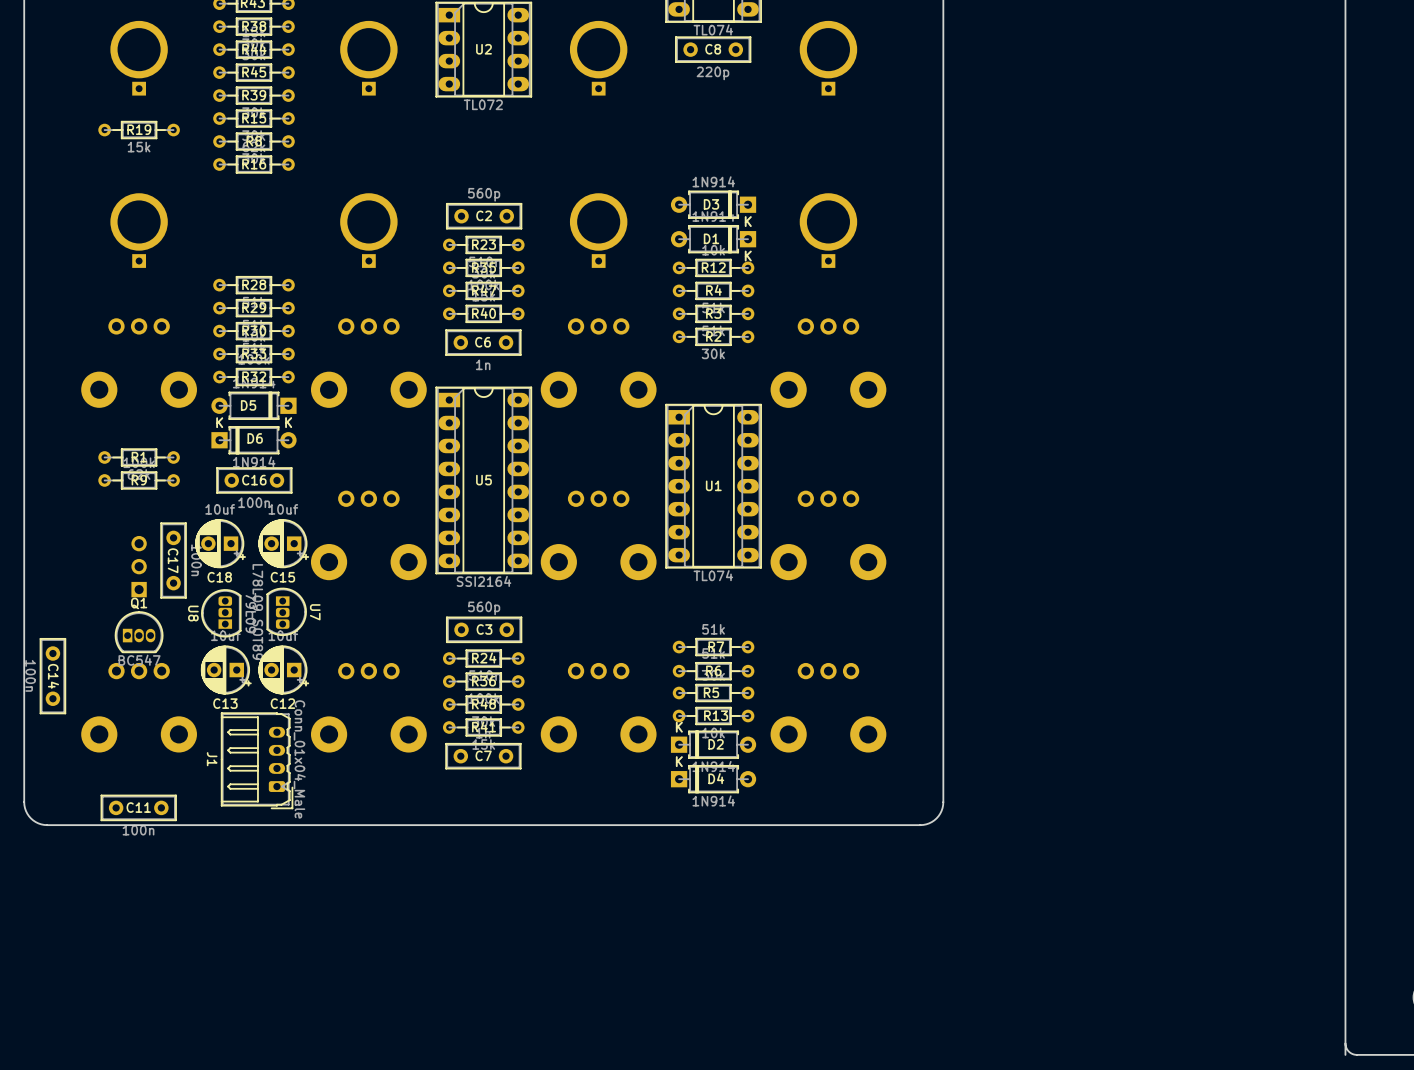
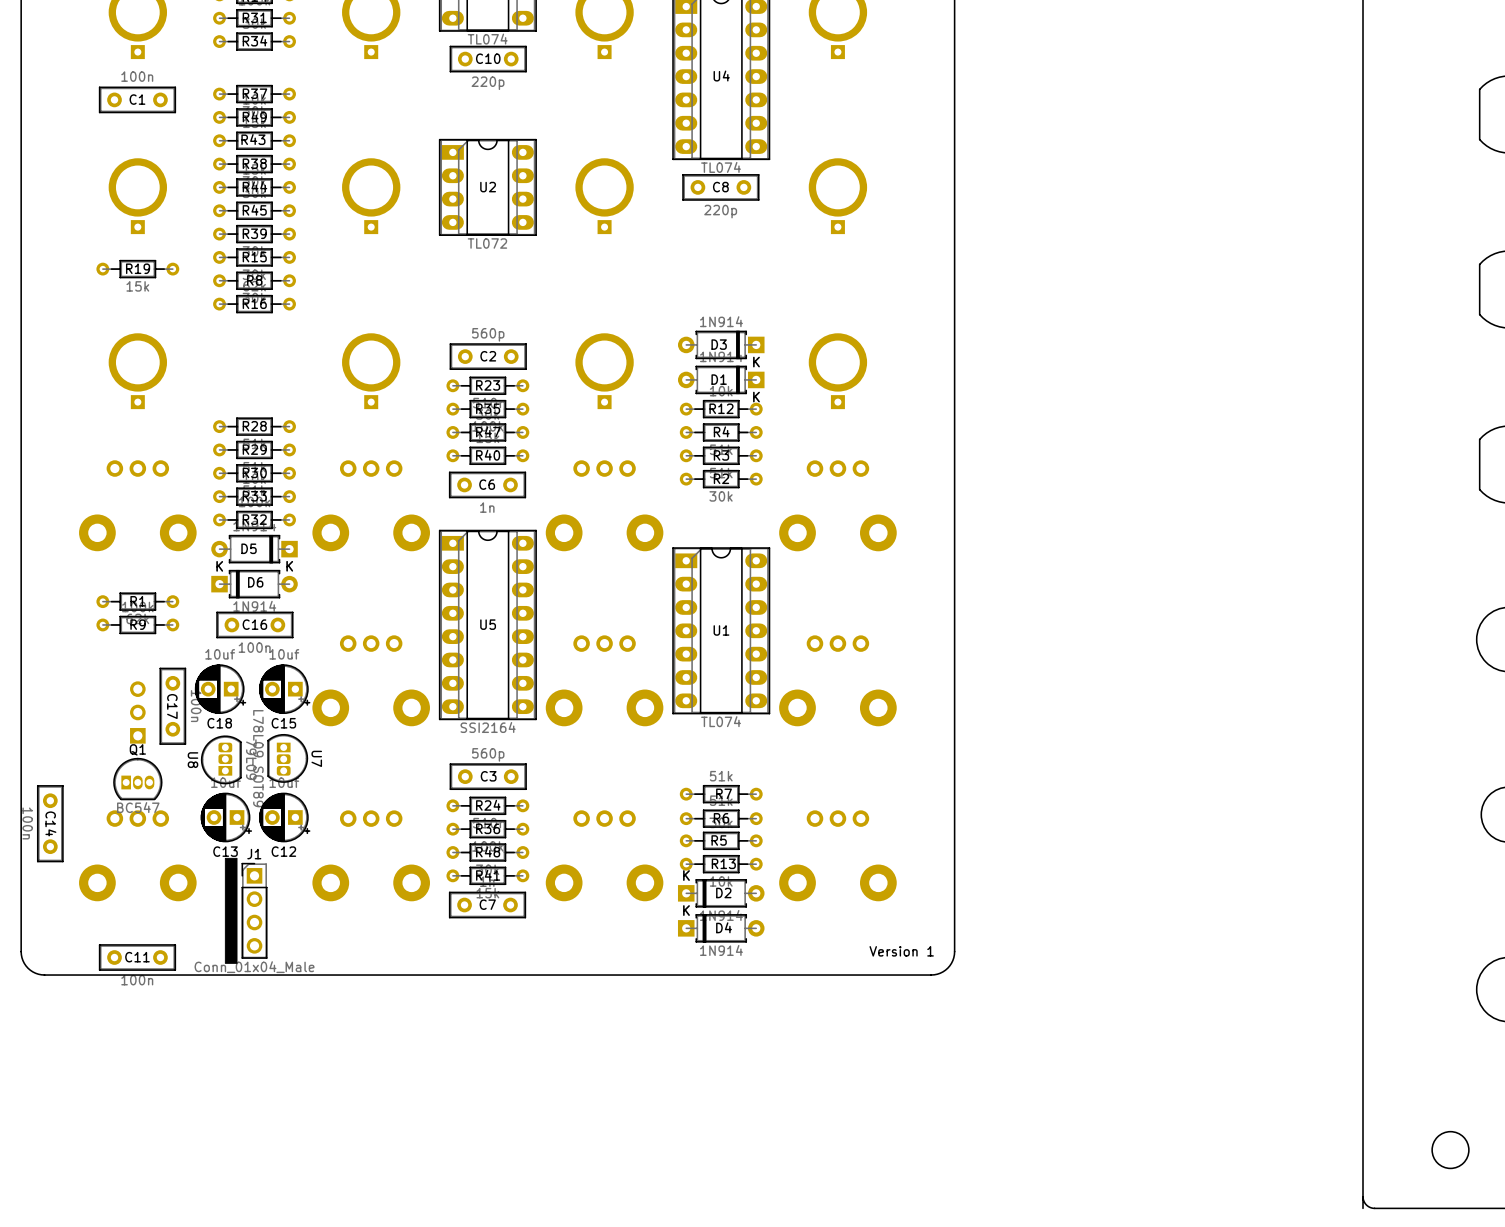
drawing: none -> [224, 857, 238, 964]
J1 footprint: [221, 712, 293, 809] -> [241, 863, 268, 959]
J1 name position: J1 (212, 759) -> J1 (254, 854)
J1 value position: Conn_01x04_Male (299, 759) -> Conn_01x04_Male (254, 967)
text: none -> Version 1 (901, 951)

